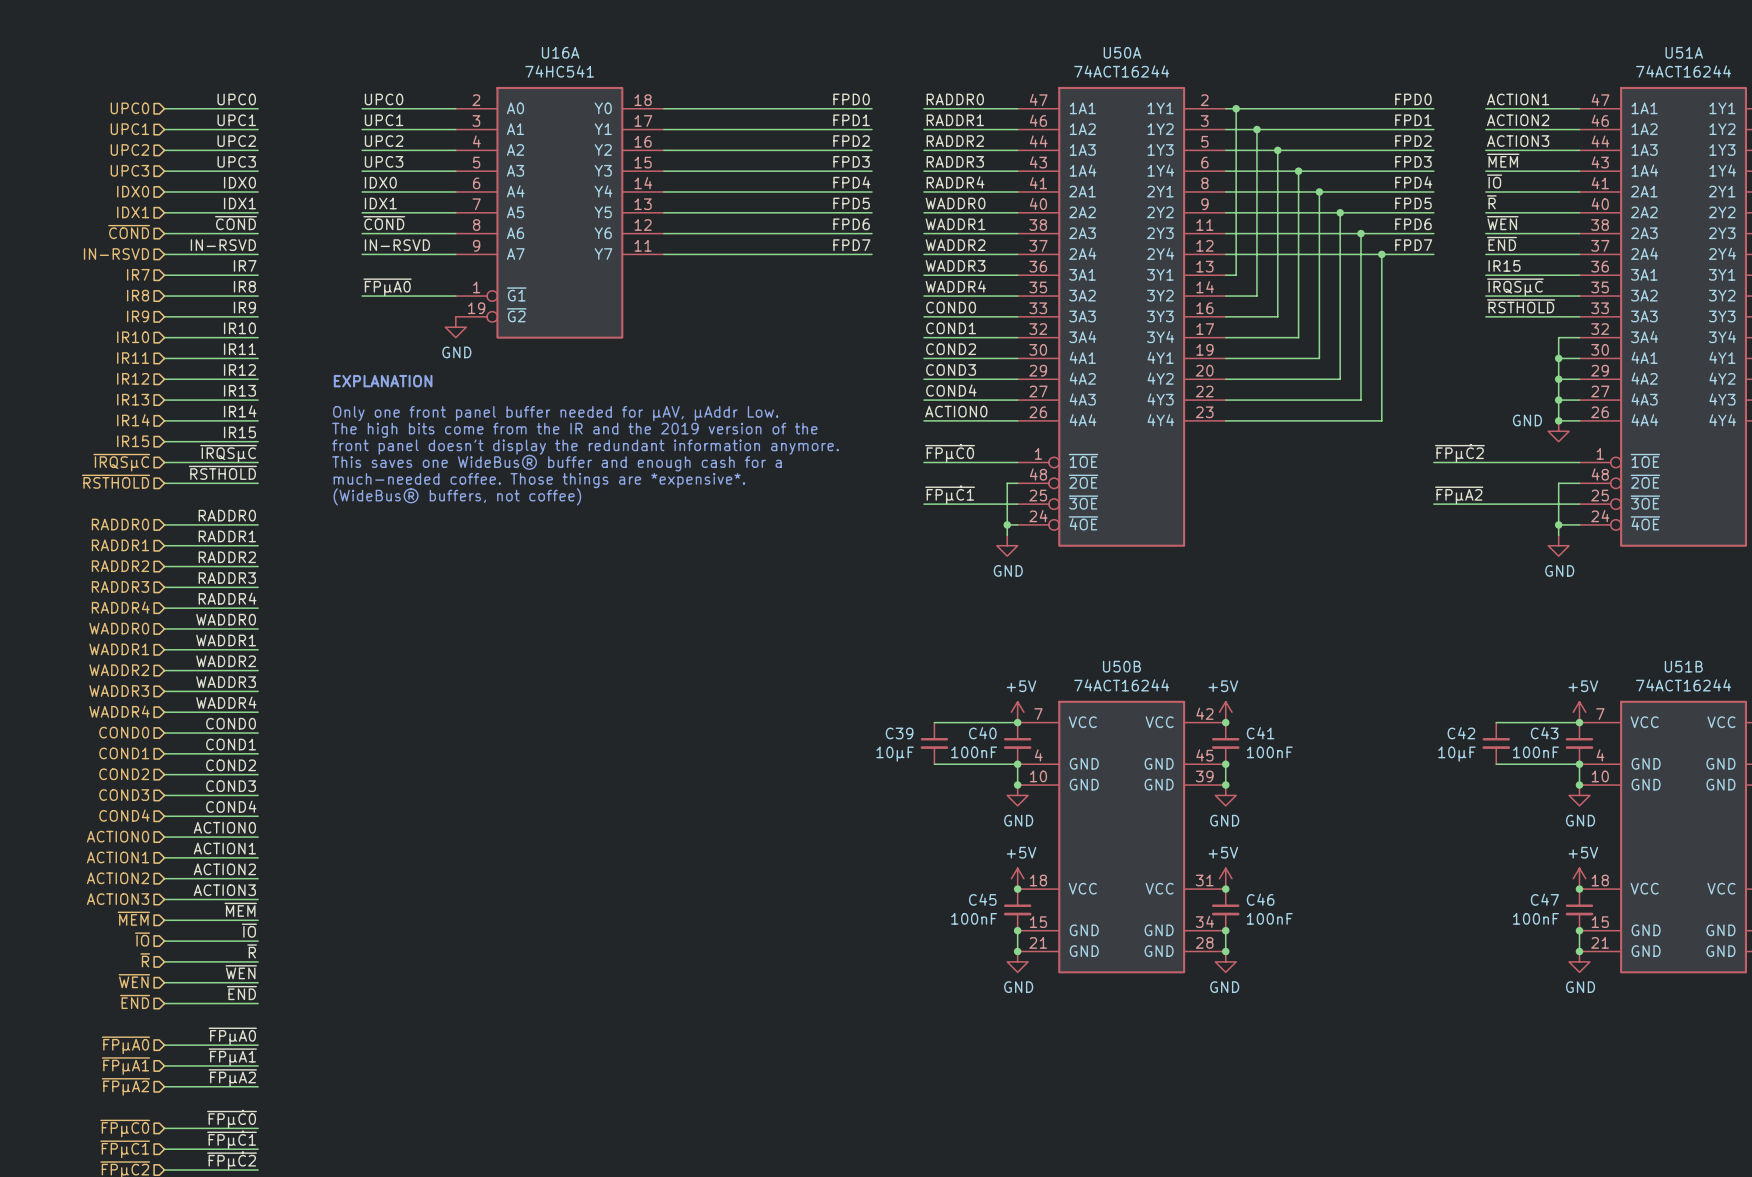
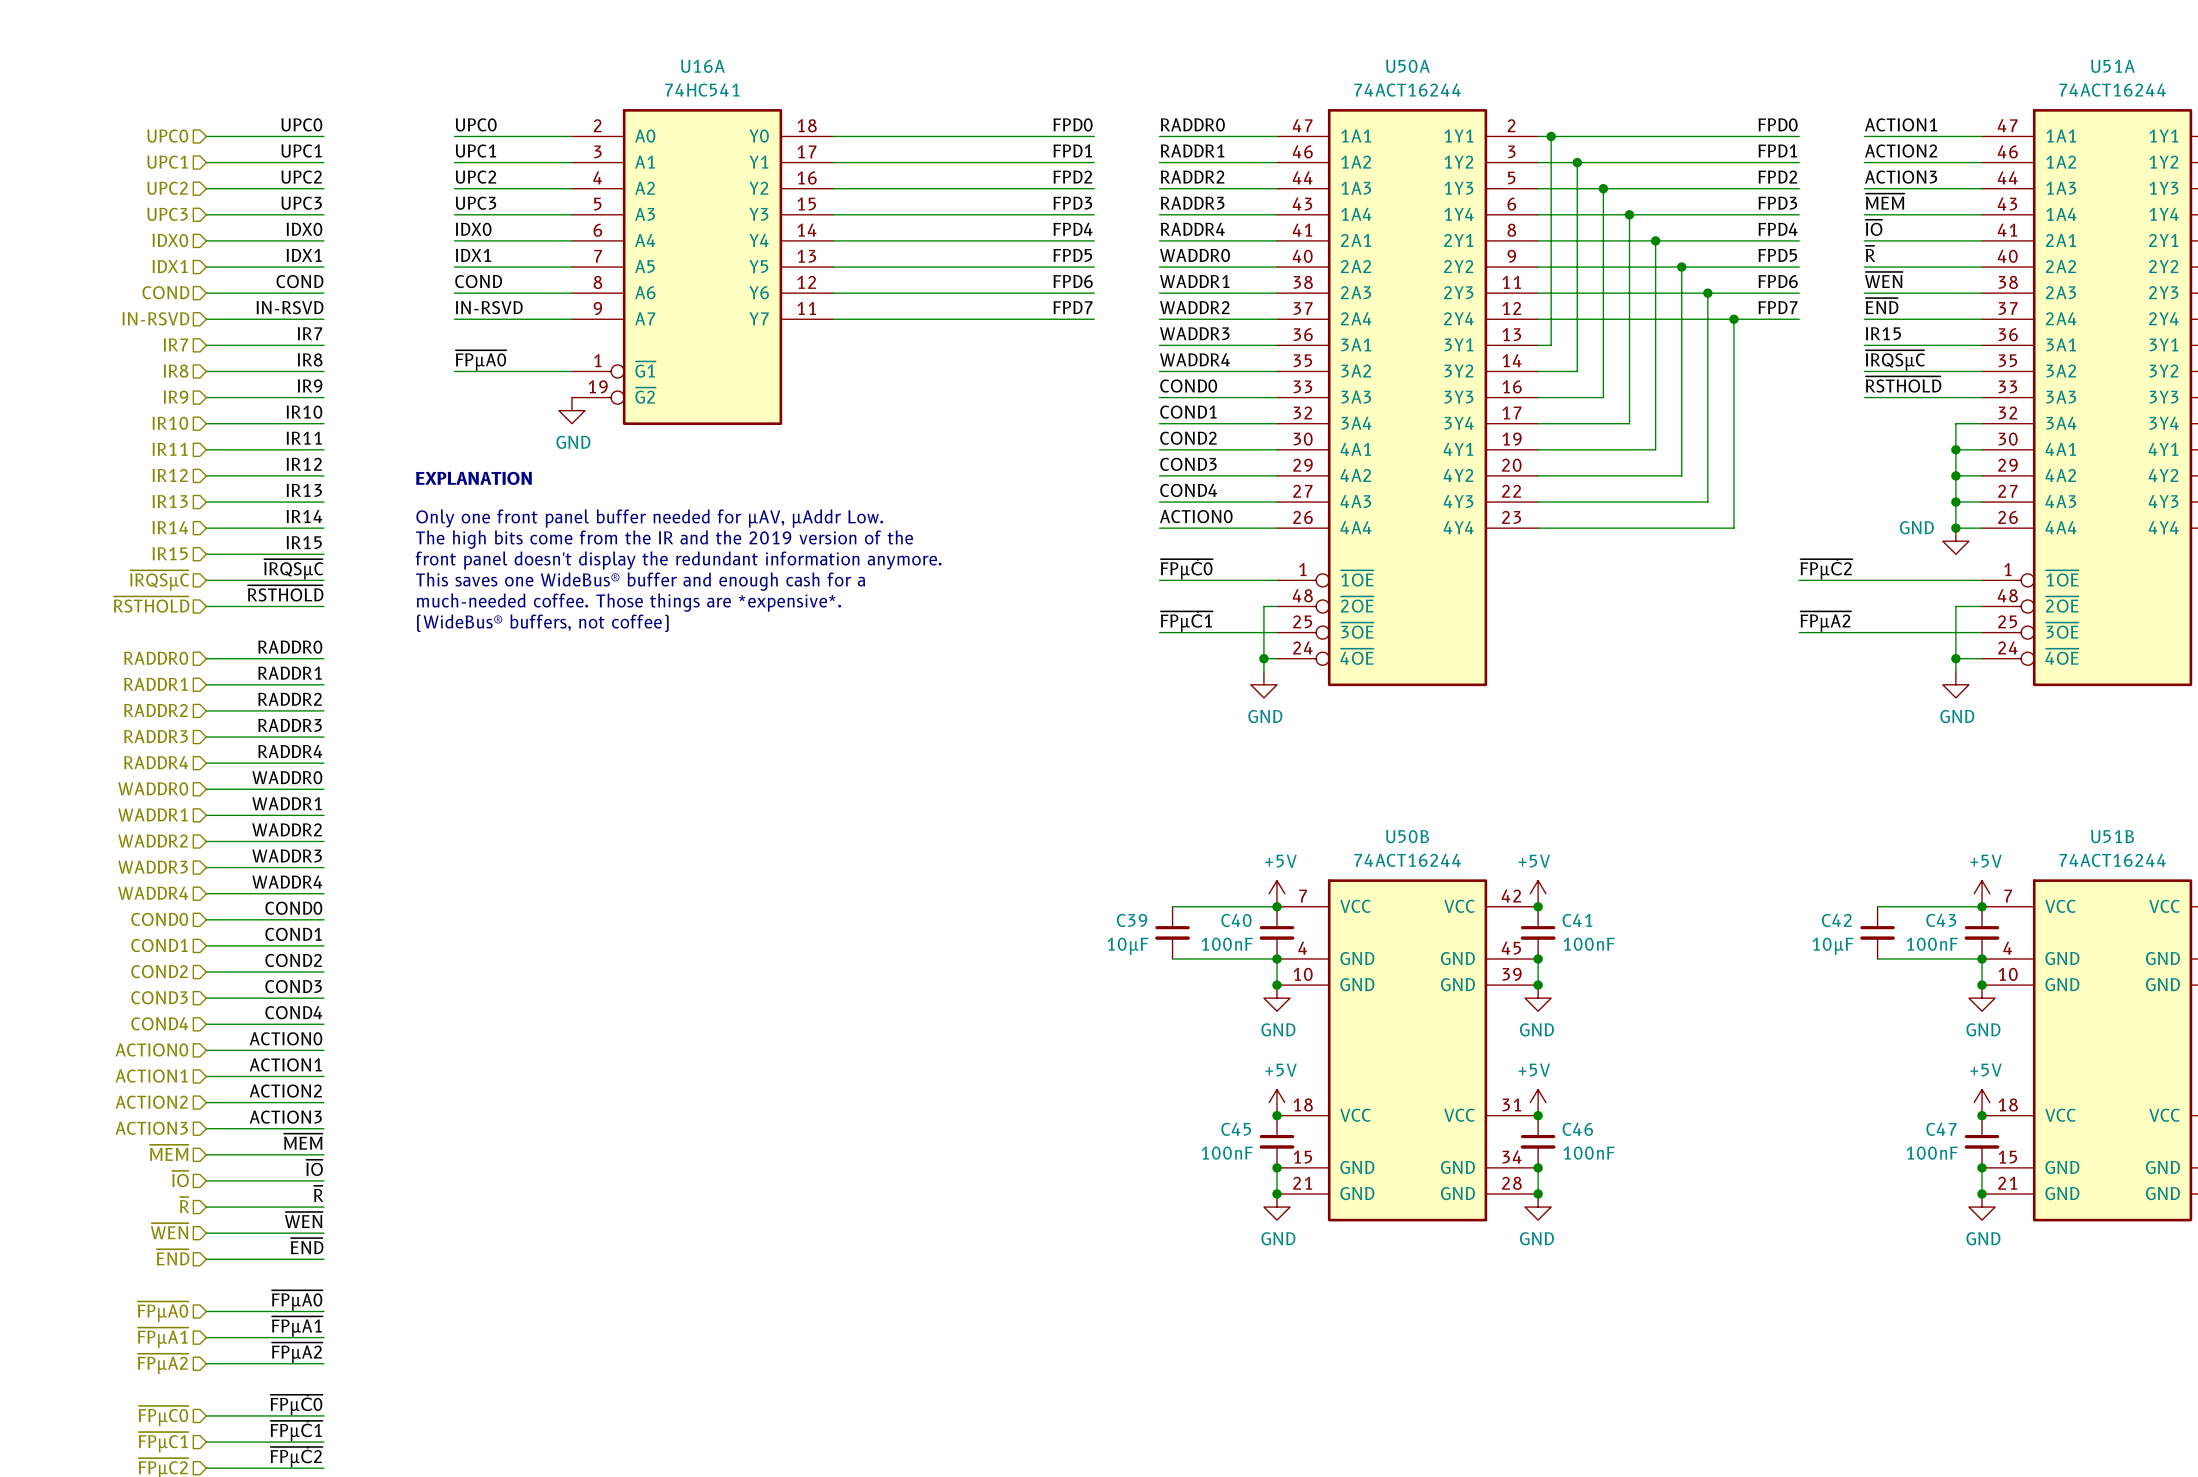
label: ~{COND} (236, 223) -> COND (299, 281)
label: ~{COND} (384, 223) -> COND (478, 281)
hierarchical label: ~{COND} (129, 232) -> COND (165, 292)

